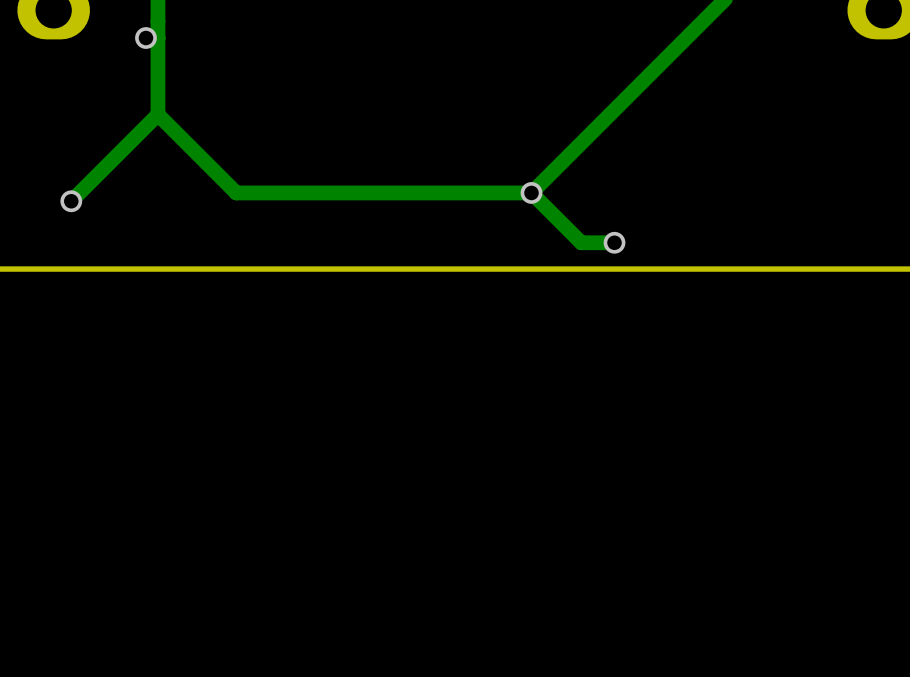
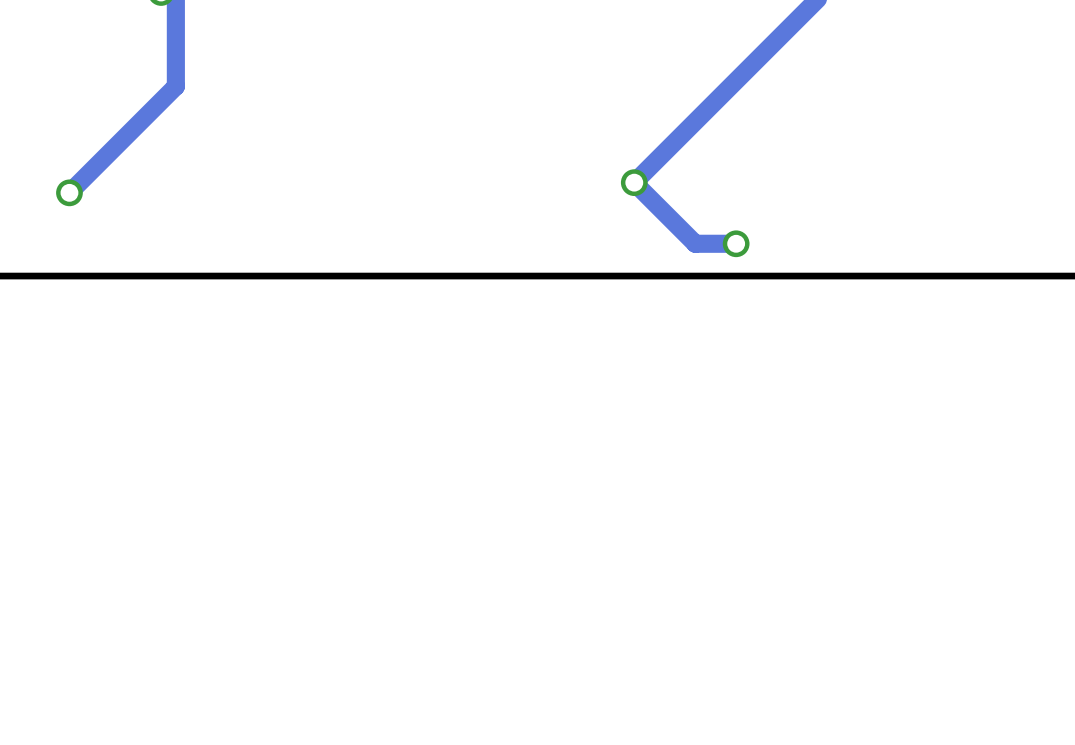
track: (157, 114) (236, 192) (531, 192) -> none

